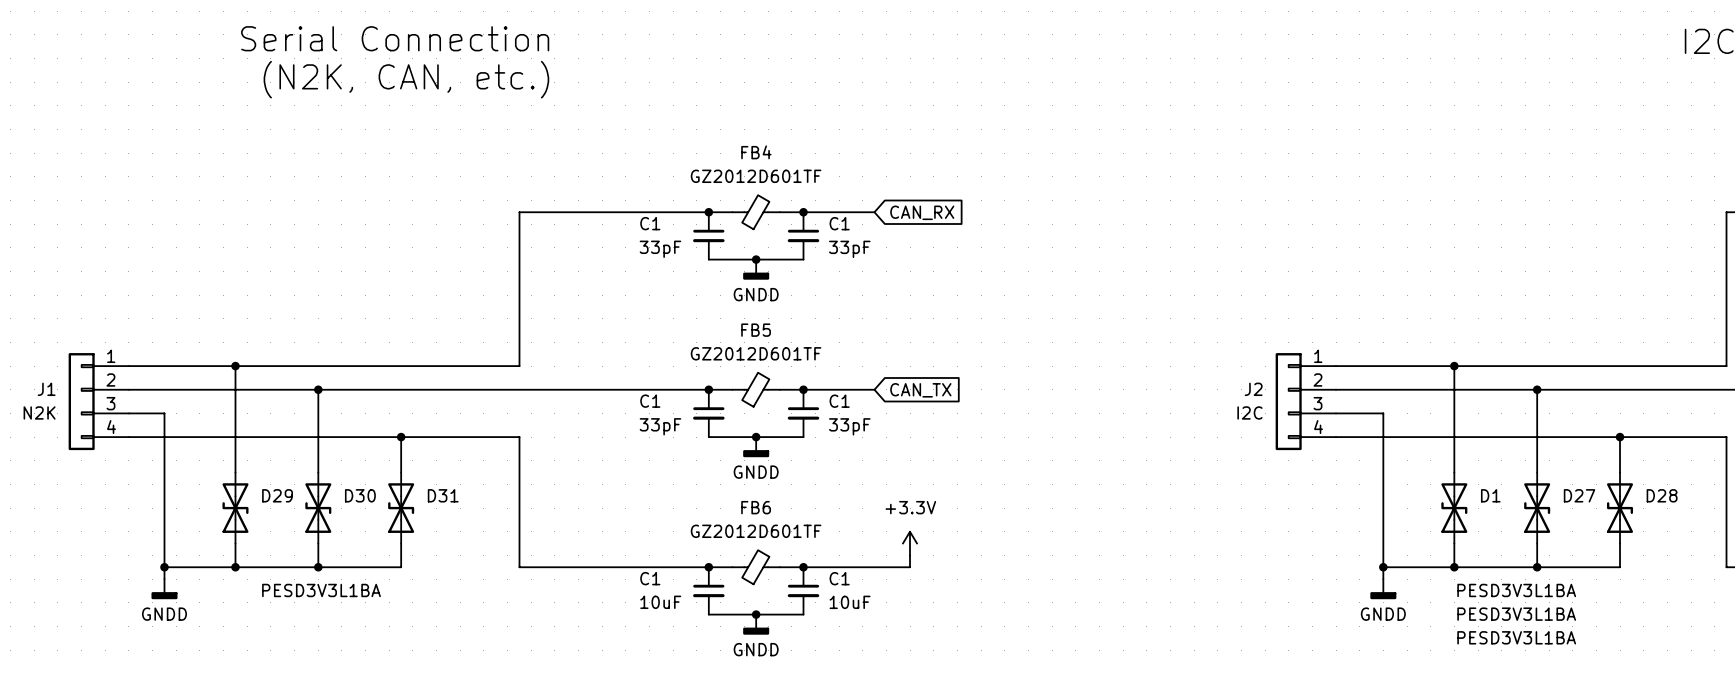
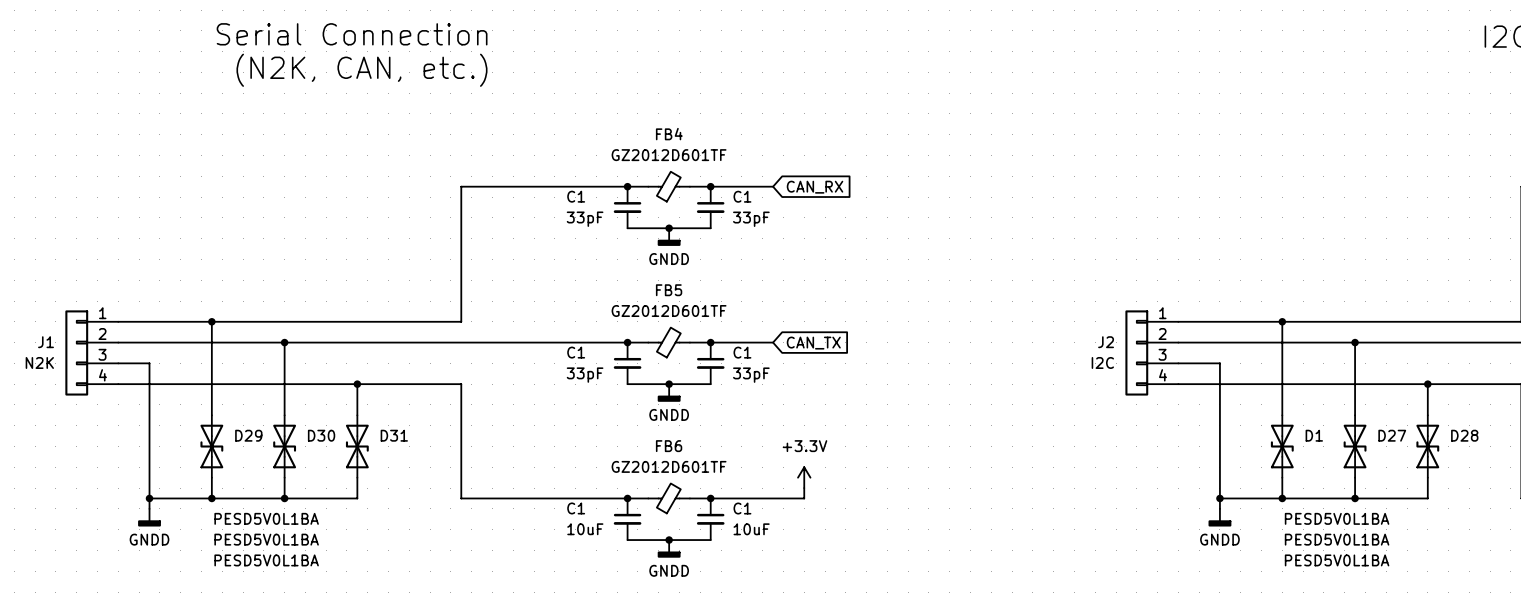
D29 value: PESD3V3L1BA (321, 590) -> PESD5V0L1BA (266, 518)
D1 value: PESD3V3L1BA (1516, 590) -> PESD5V0L1BA (1337, 518)
D30 value: none -> PESD5V0L1BA (266, 539)
D27 value: PESD3V3L1BA (1516, 614) -> PESD5V0L1BA (1337, 539)
D31 value: none -> PESD5V0L1BA (266, 560)
D28 value: PESD3V3L1BA (1516, 637) -> PESD5V0L1BA (1337, 560)

